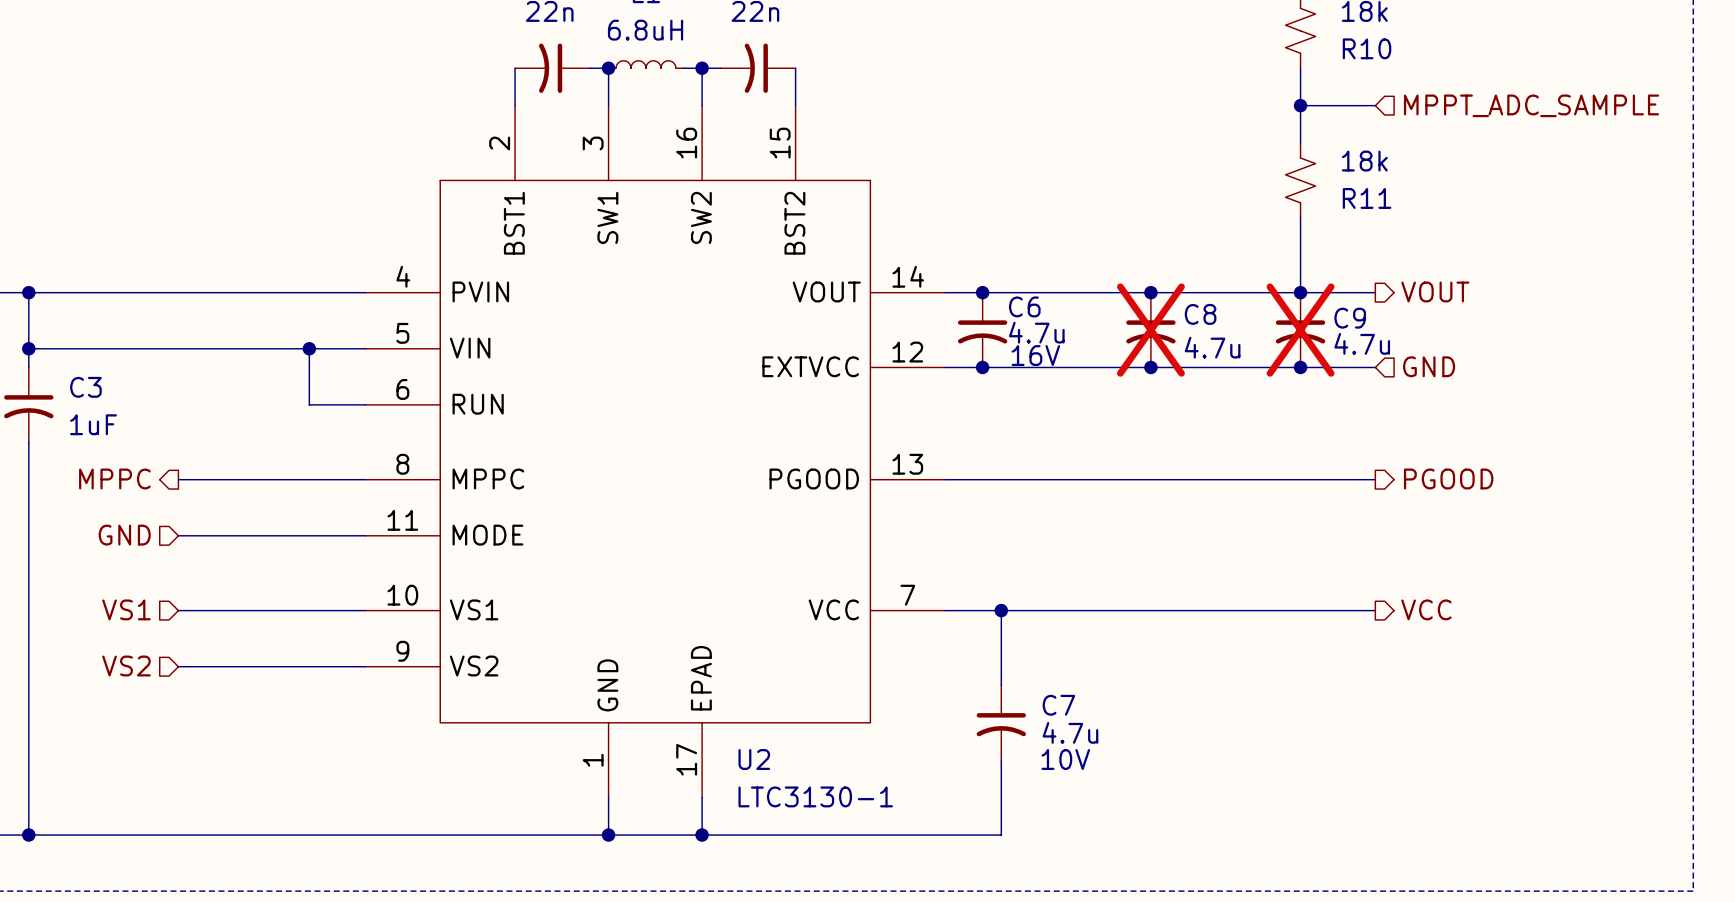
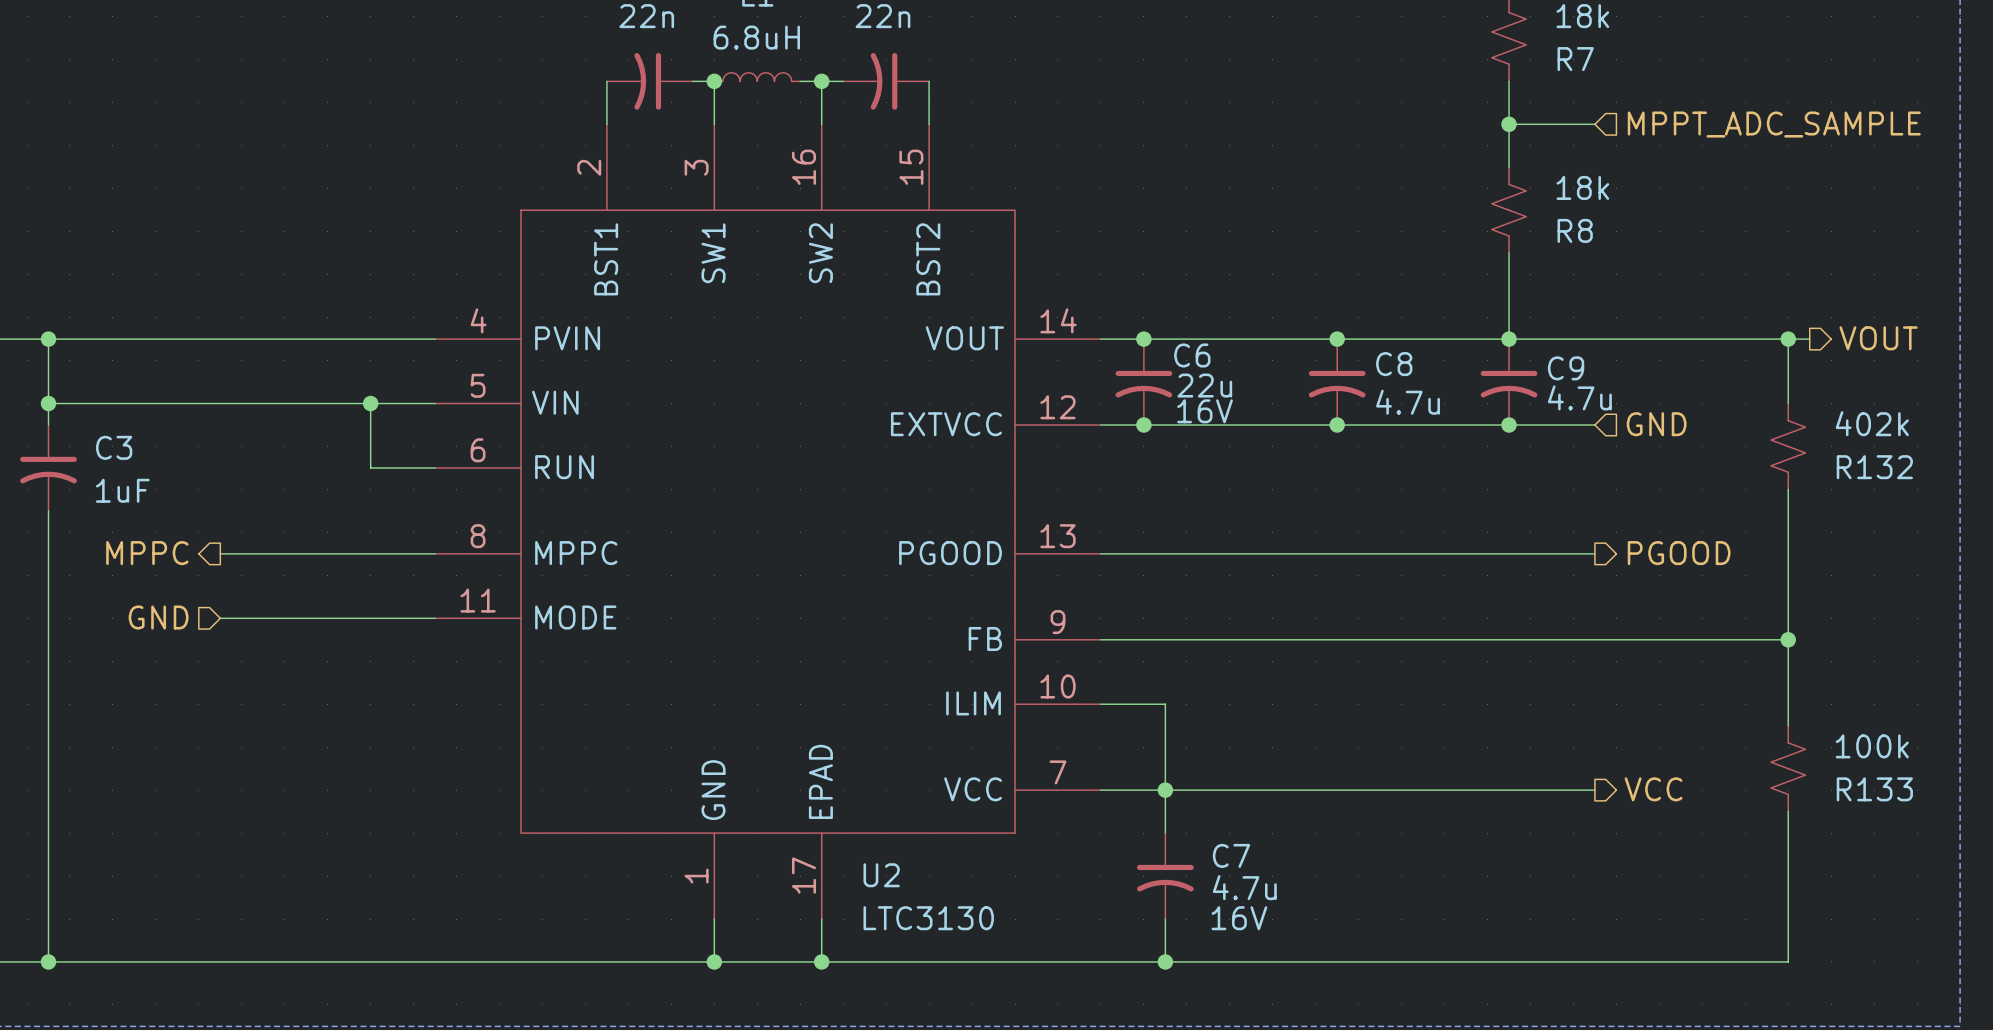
R10 name: R10 (1367, 48) -> R7 (1575, 59)
U2 symbol: [365, 105, 946, 798] -> [435, 124, 1101, 920]
R11 name: R11 (1367, 198) -> R8 (1575, 230)
hierarchical label position: VOUT (1435, 291) -> VOUT (1878, 338)
wire: none -> (1594, 339) (1809, 339)
wire: none -> (1788, 339) (1788, 403)
junction: none -> (1788, 339)
C8 do-not-place cross: (1150, 330) -> none
C9 do-not-place cross: (1300, 330) -> none
C6 value: 4.7u (1036, 332) -> 22u (1204, 385)
R132: none -> 402k (1788, 446)
wire: none -> (1788, 489) (1788, 725)
wire: none -> (1100, 639) (1788, 639)
junction: none -> (1788, 639)
hierarchical label: VS1 (126, 609) -> none
hierarchical label position: VCC (1426, 609) -> VCC (1653, 789)
wire: (178, 610) (365, 610) -> none
wire: (1001, 610) (1375, 610) -> none
junction position: (1001, 610) -> (1165, 790)
hierarchical label: VS2 (126, 666) -> none
wire: (178, 666) (365, 666) -> none
R133: none -> 100k (1788, 768)
wire: none -> (1100, 790) (1594, 790)
wire: none -> (1788, 811) (1788, 961) (1165, 961)
C7 position: (1001, 722) -> (1165, 876)
C7 text: 10V (1065, 759) -> 16V (1239, 918)
U2 value: LTC3130-1 (815, 796) -> LTC3130 (928, 918)
junction: none -> (1165, 961)

